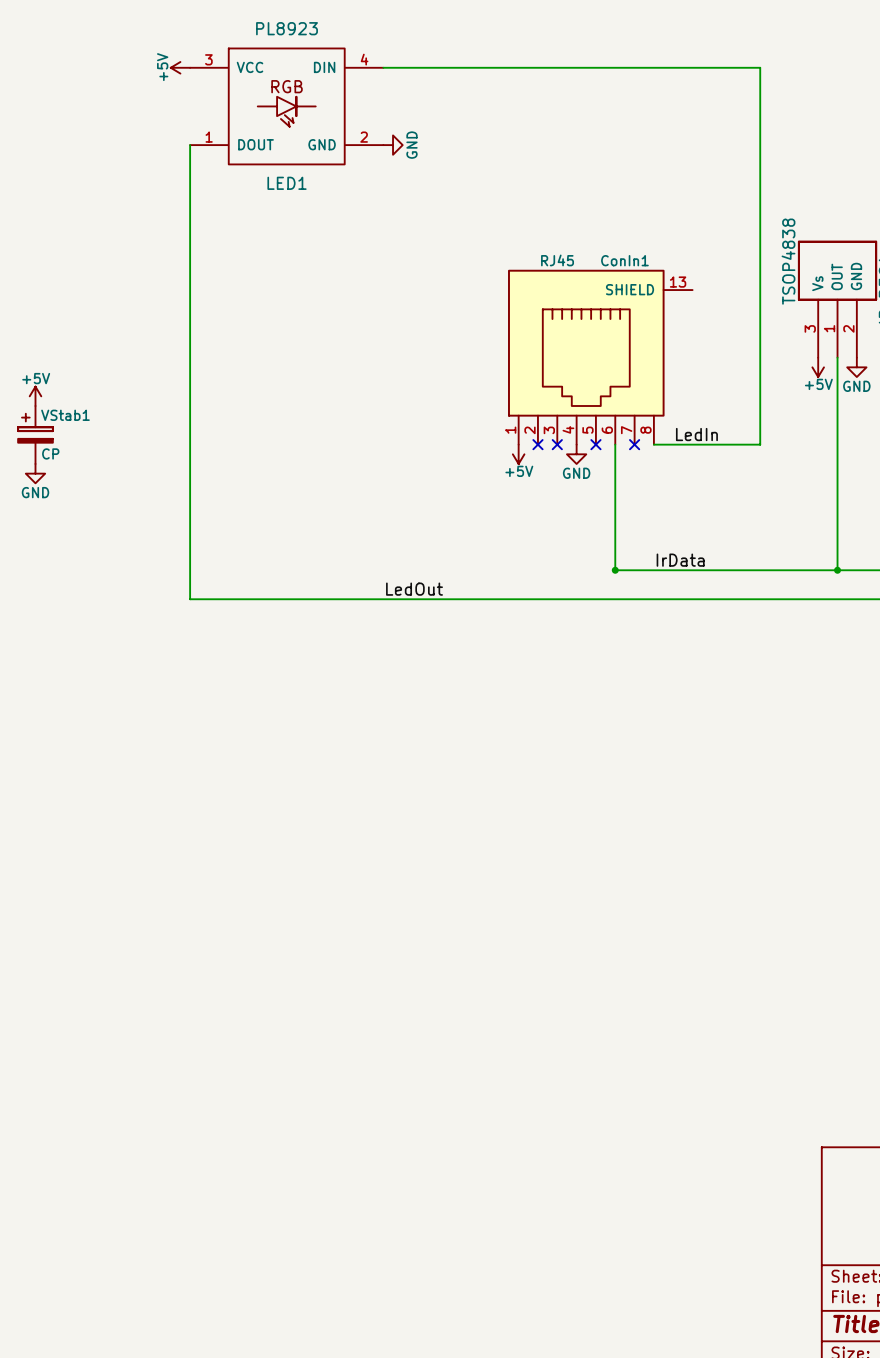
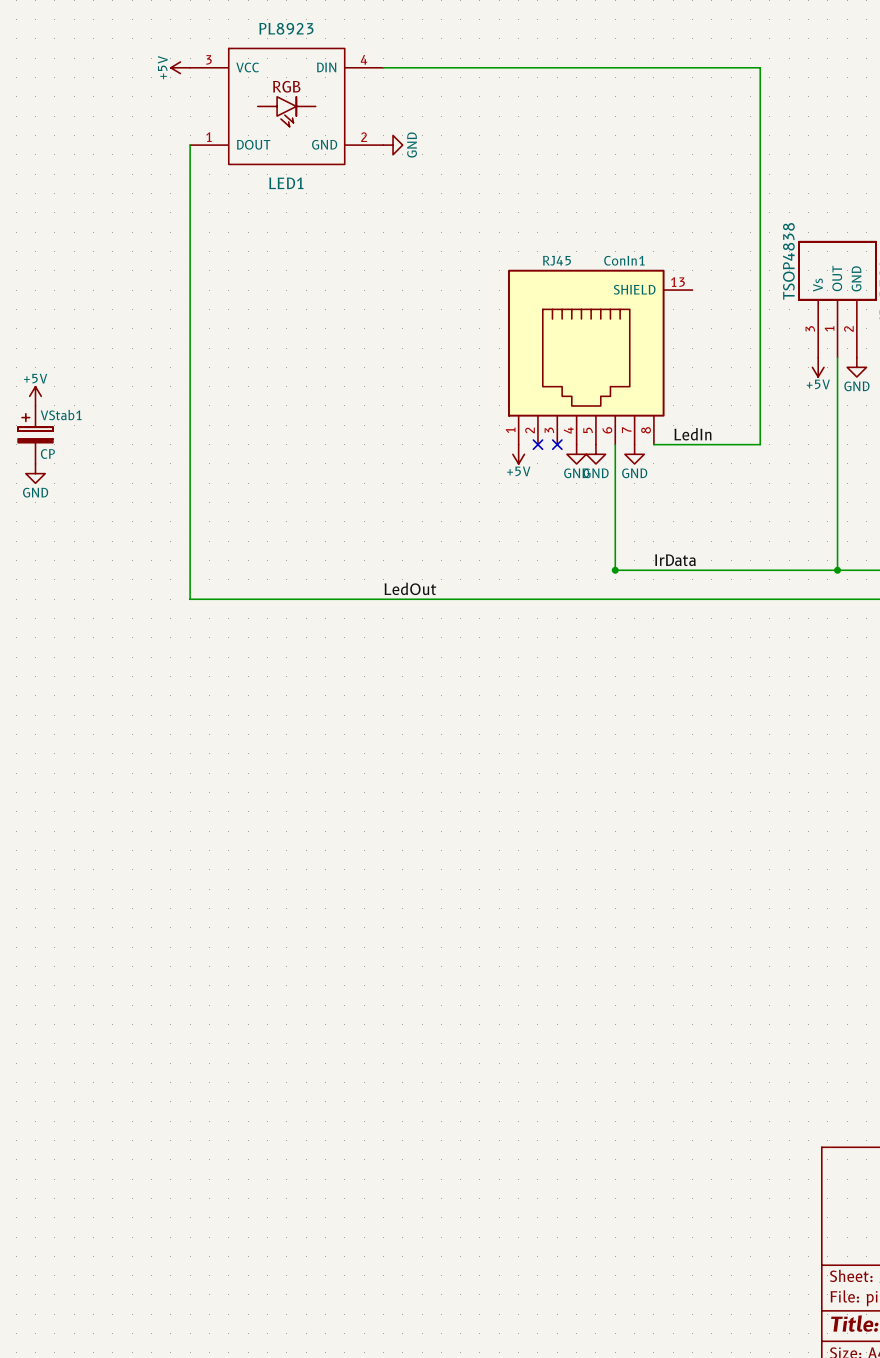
no-connect mark: (595, 444) -> none
no-connect mark: (634, 444) -> none
power symbol: none -> GND (595, 454)
power symbol: none -> GND (634, 454)

